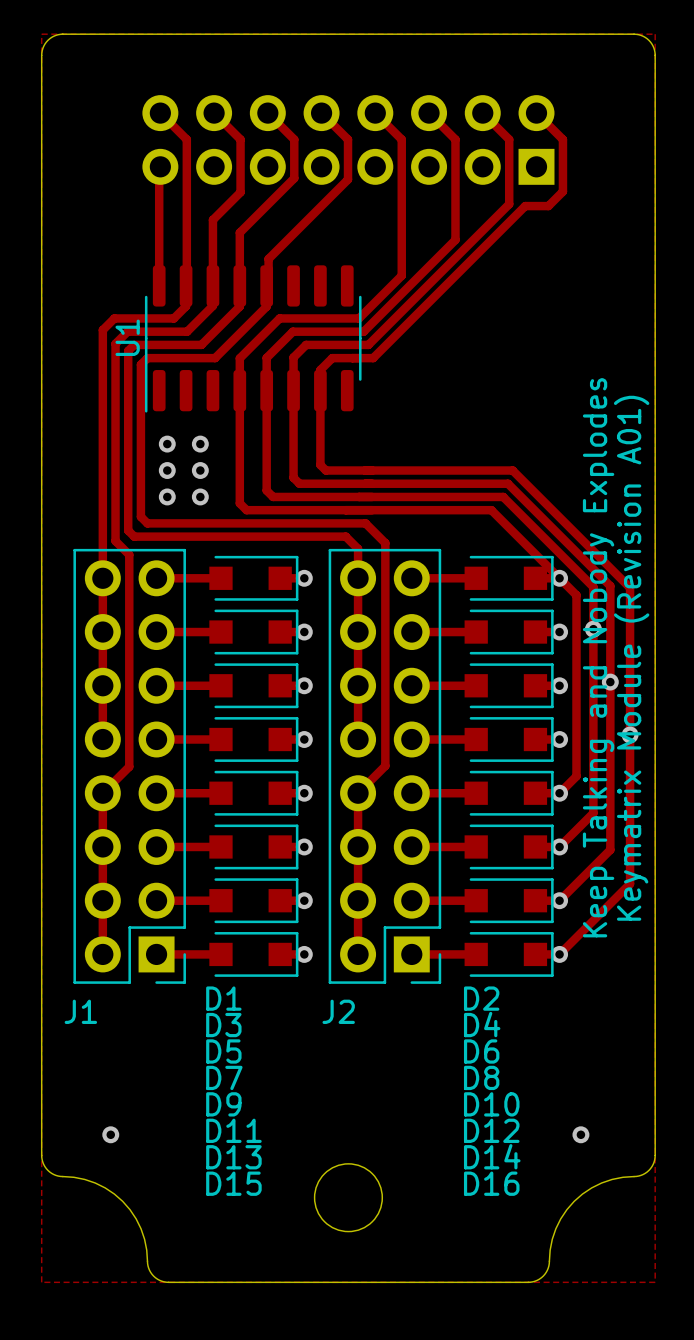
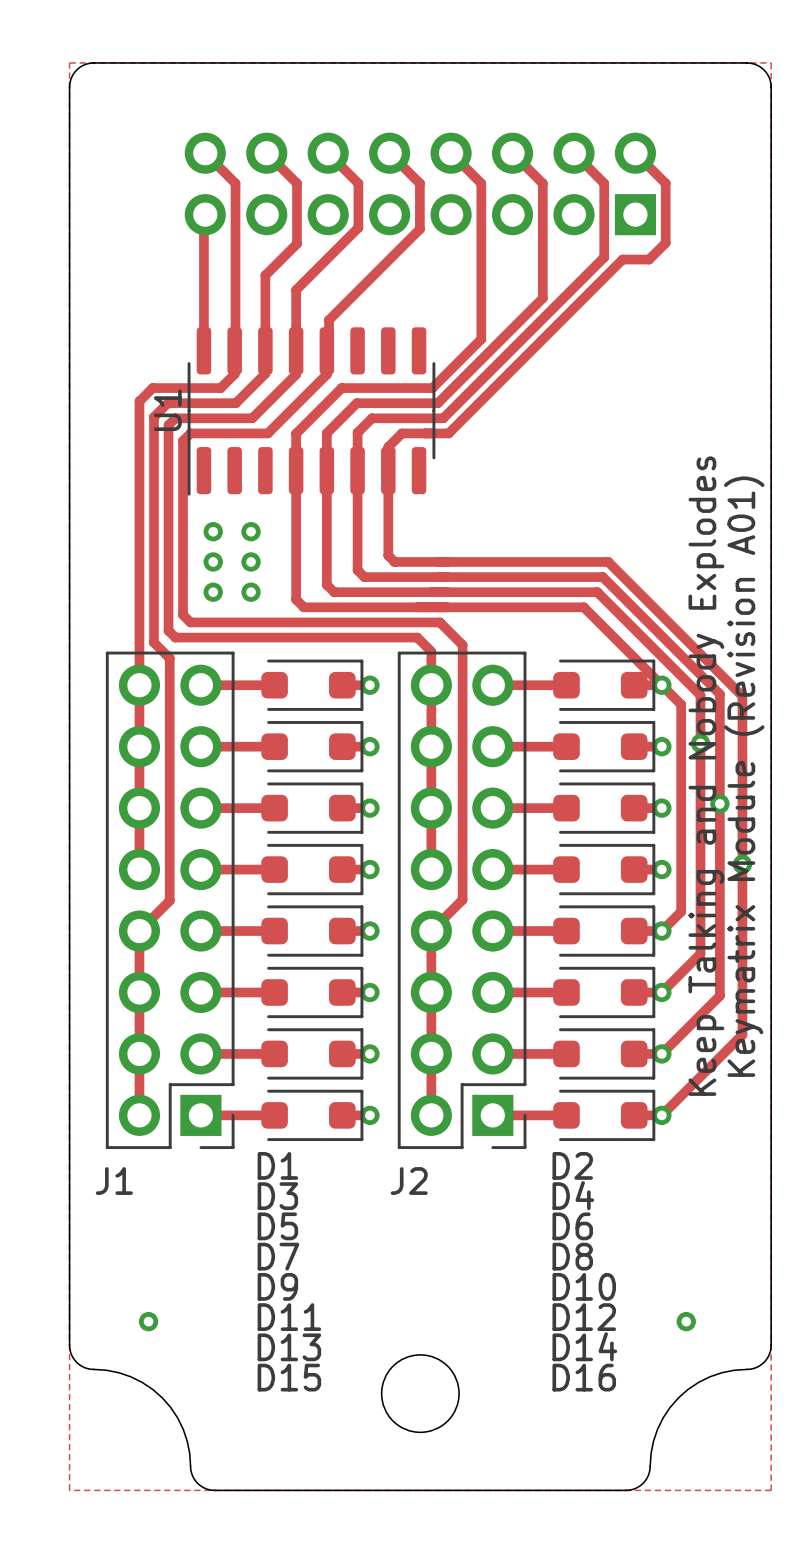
D1 footprint: [209, 555, 299, 601] -> [261, 659, 364, 711]
D2 footprint: [464, 555, 554, 601] -> [553, 659, 656, 711]
D3 footprint: [209, 609, 299, 655] -> [261, 721, 364, 773]
D4 footprint: [464, 609, 554, 655] -> [553, 721, 656, 773]
D5 footprint: [209, 663, 299, 709] -> [261, 782, 364, 834]
D6 footprint: [464, 663, 554, 709] -> [553, 782, 656, 834]
D7 footprint: [209, 717, 299, 762] -> [261, 843, 364, 896]
D8 footprint: [464, 717, 554, 762] -> [553, 843, 656, 896]
D9 footprint: [209, 770, 299, 816] -> [261, 905, 364, 957]
D10 footprint: [464, 770, 554, 816] -> [553, 905, 656, 957]
D11 footprint: [209, 824, 299, 870] -> [261, 966, 364, 1019]
D12 footprint: [464, 824, 554, 870] -> [553, 966, 656, 1019]
D13 footprint: [209, 878, 299, 924] -> [261, 1028, 364, 1080]
D14 footprint: [464, 878, 554, 924] -> [553, 1028, 656, 1080]
D15 footprint: [209, 932, 299, 977] -> [261, 1089, 364, 1142]
D16 footprint: [464, 932, 554, 977] -> [553, 1089, 656, 1142]

